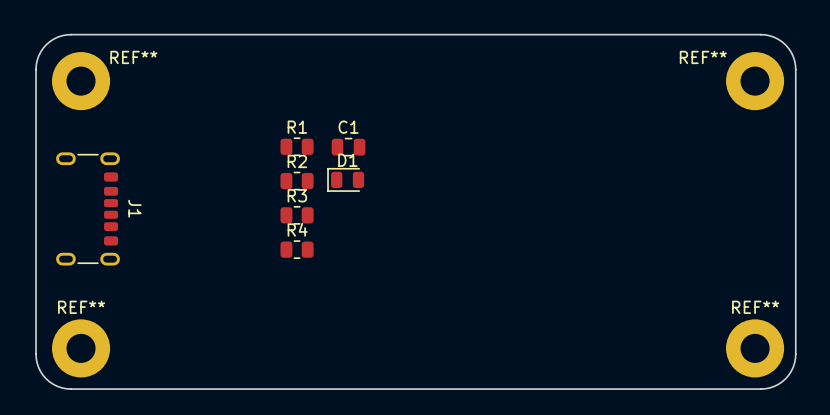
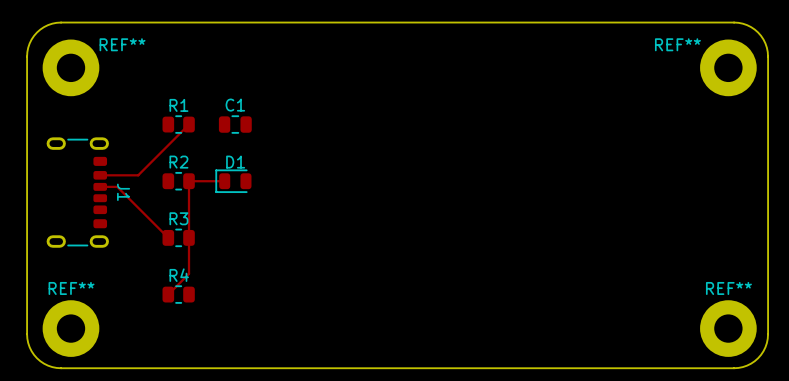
top track: none -> (189, 124) (138, 175) (100, 175)
R1 position: (297, 146) -> (178, 124)
C1 position: (348, 147) -> (235, 124)
D1 position: (345, 179) -> (233, 181)
R2 position: (297, 181) -> (178, 181)
top track: none -> (224, 181) (189, 181) (189, 273) (168, 294)
top track: none -> (100, 186) (117, 186) (168, 237)
R3 position: (297, 215) -> (178, 237)
R4 position: (297, 249) -> (178, 294)

